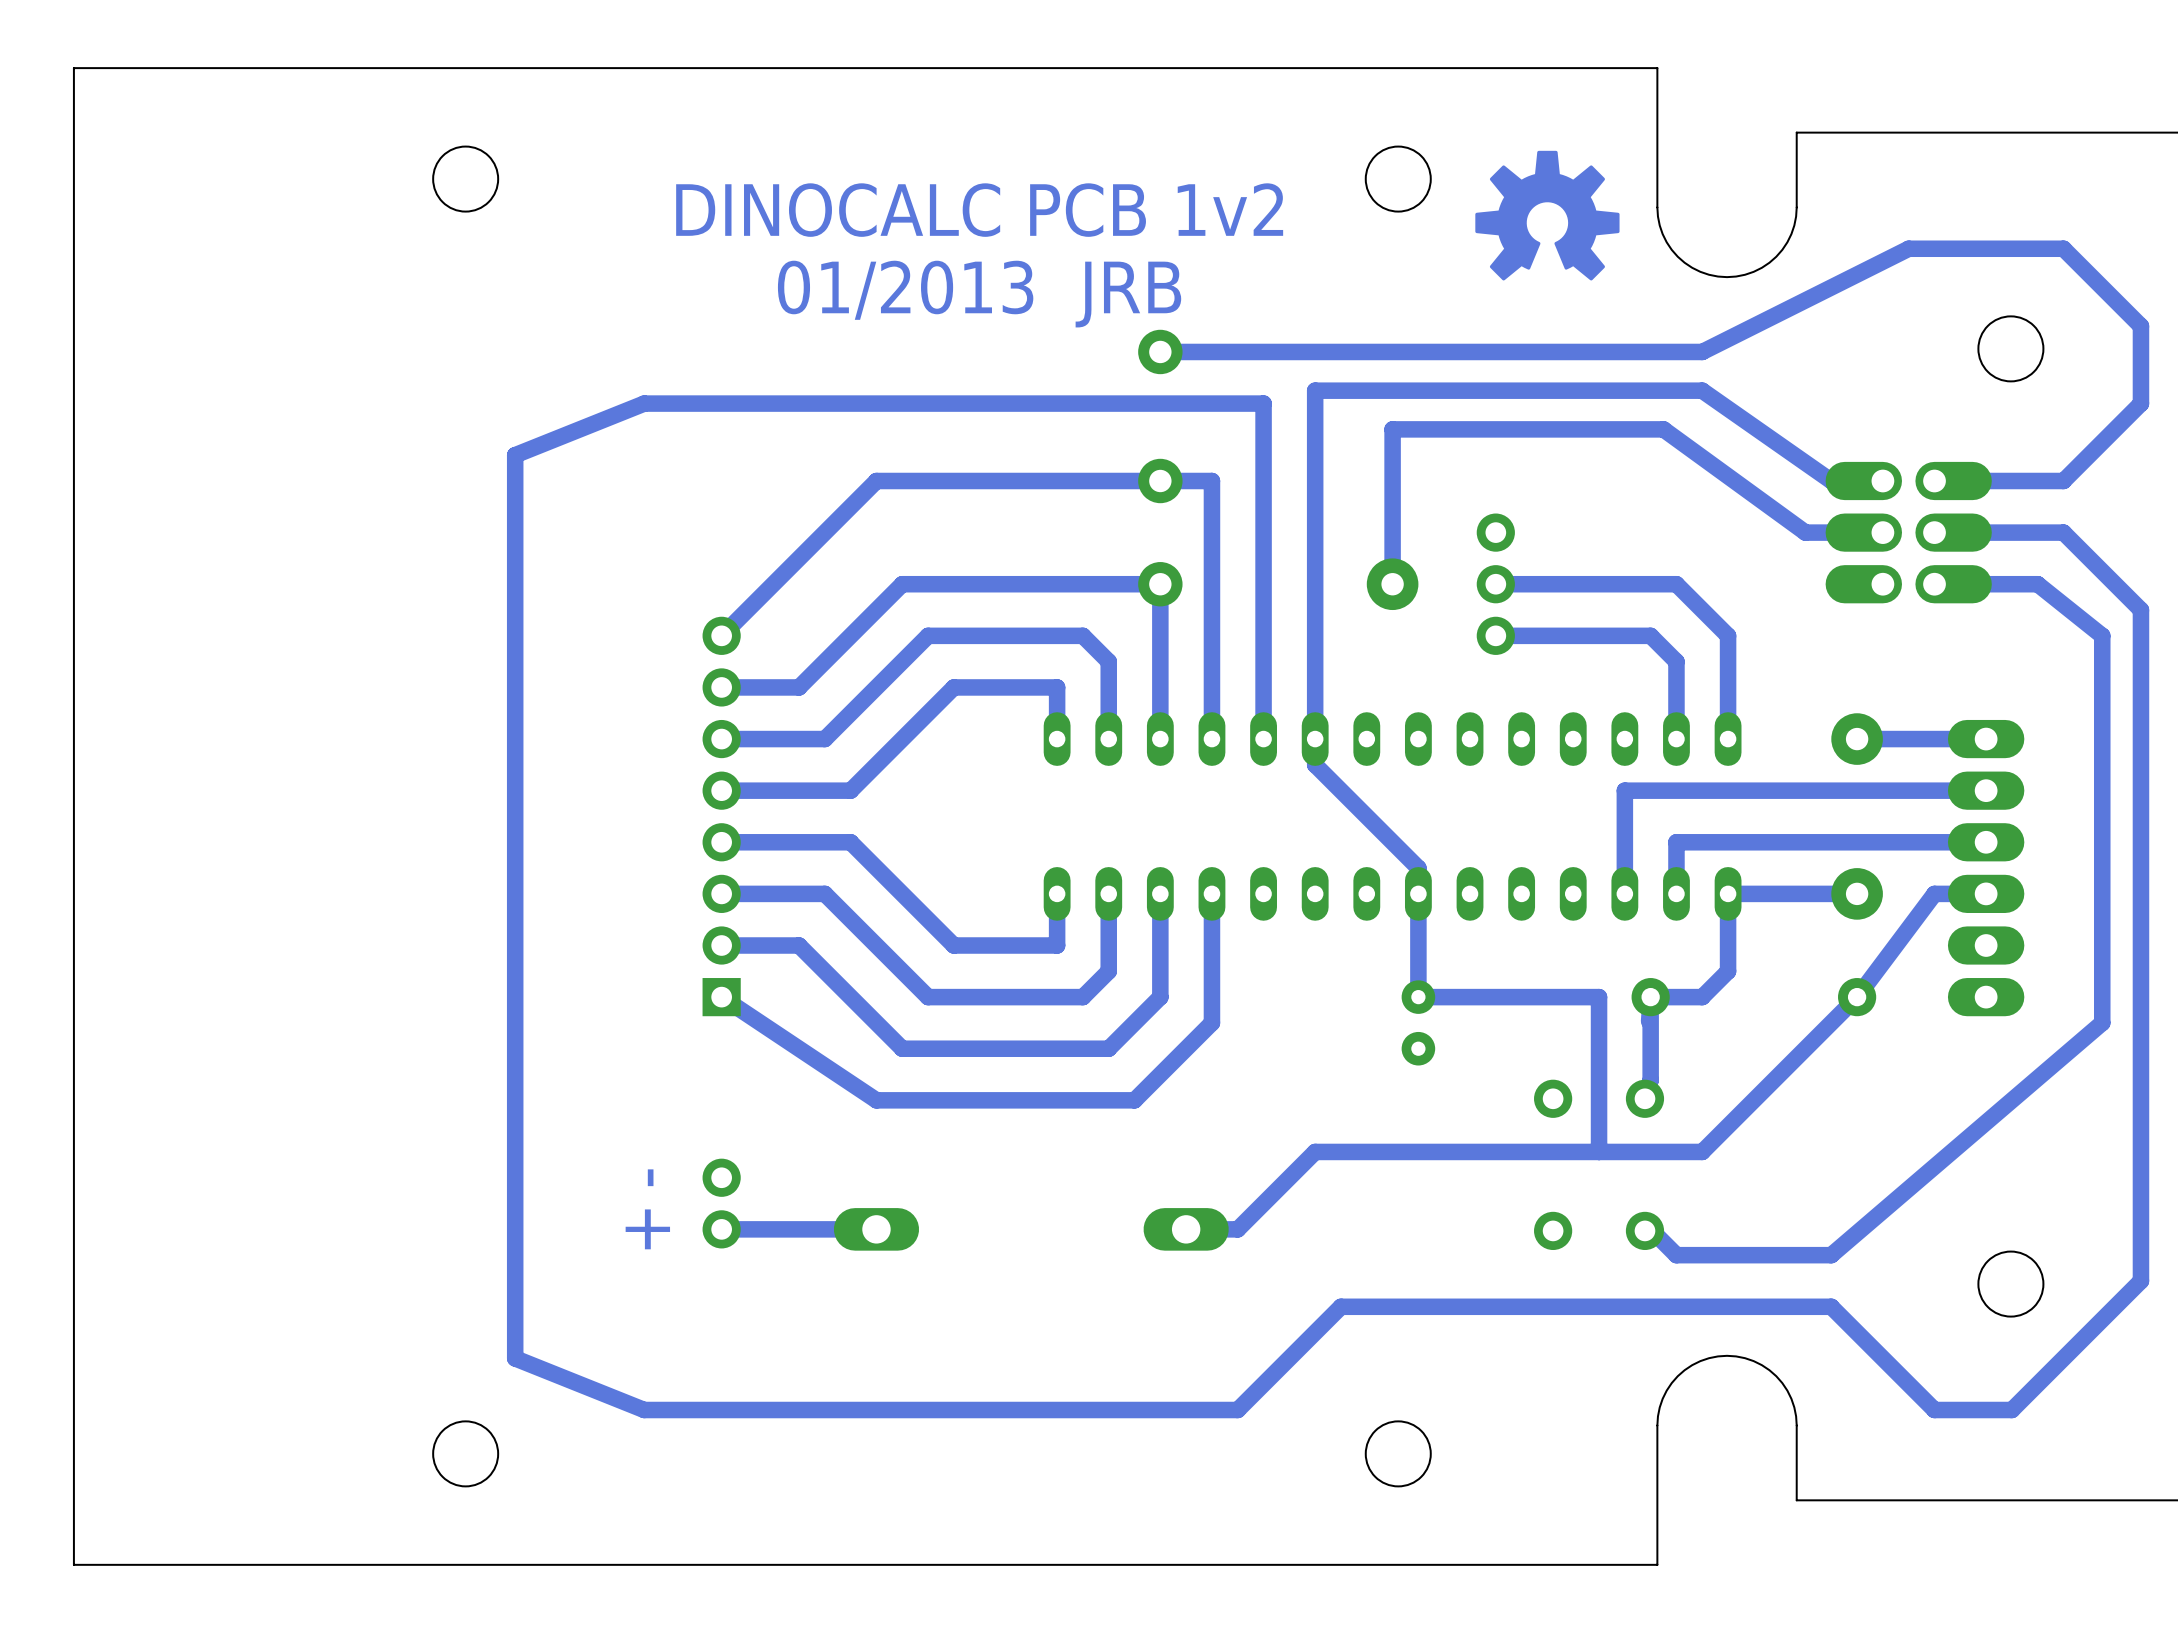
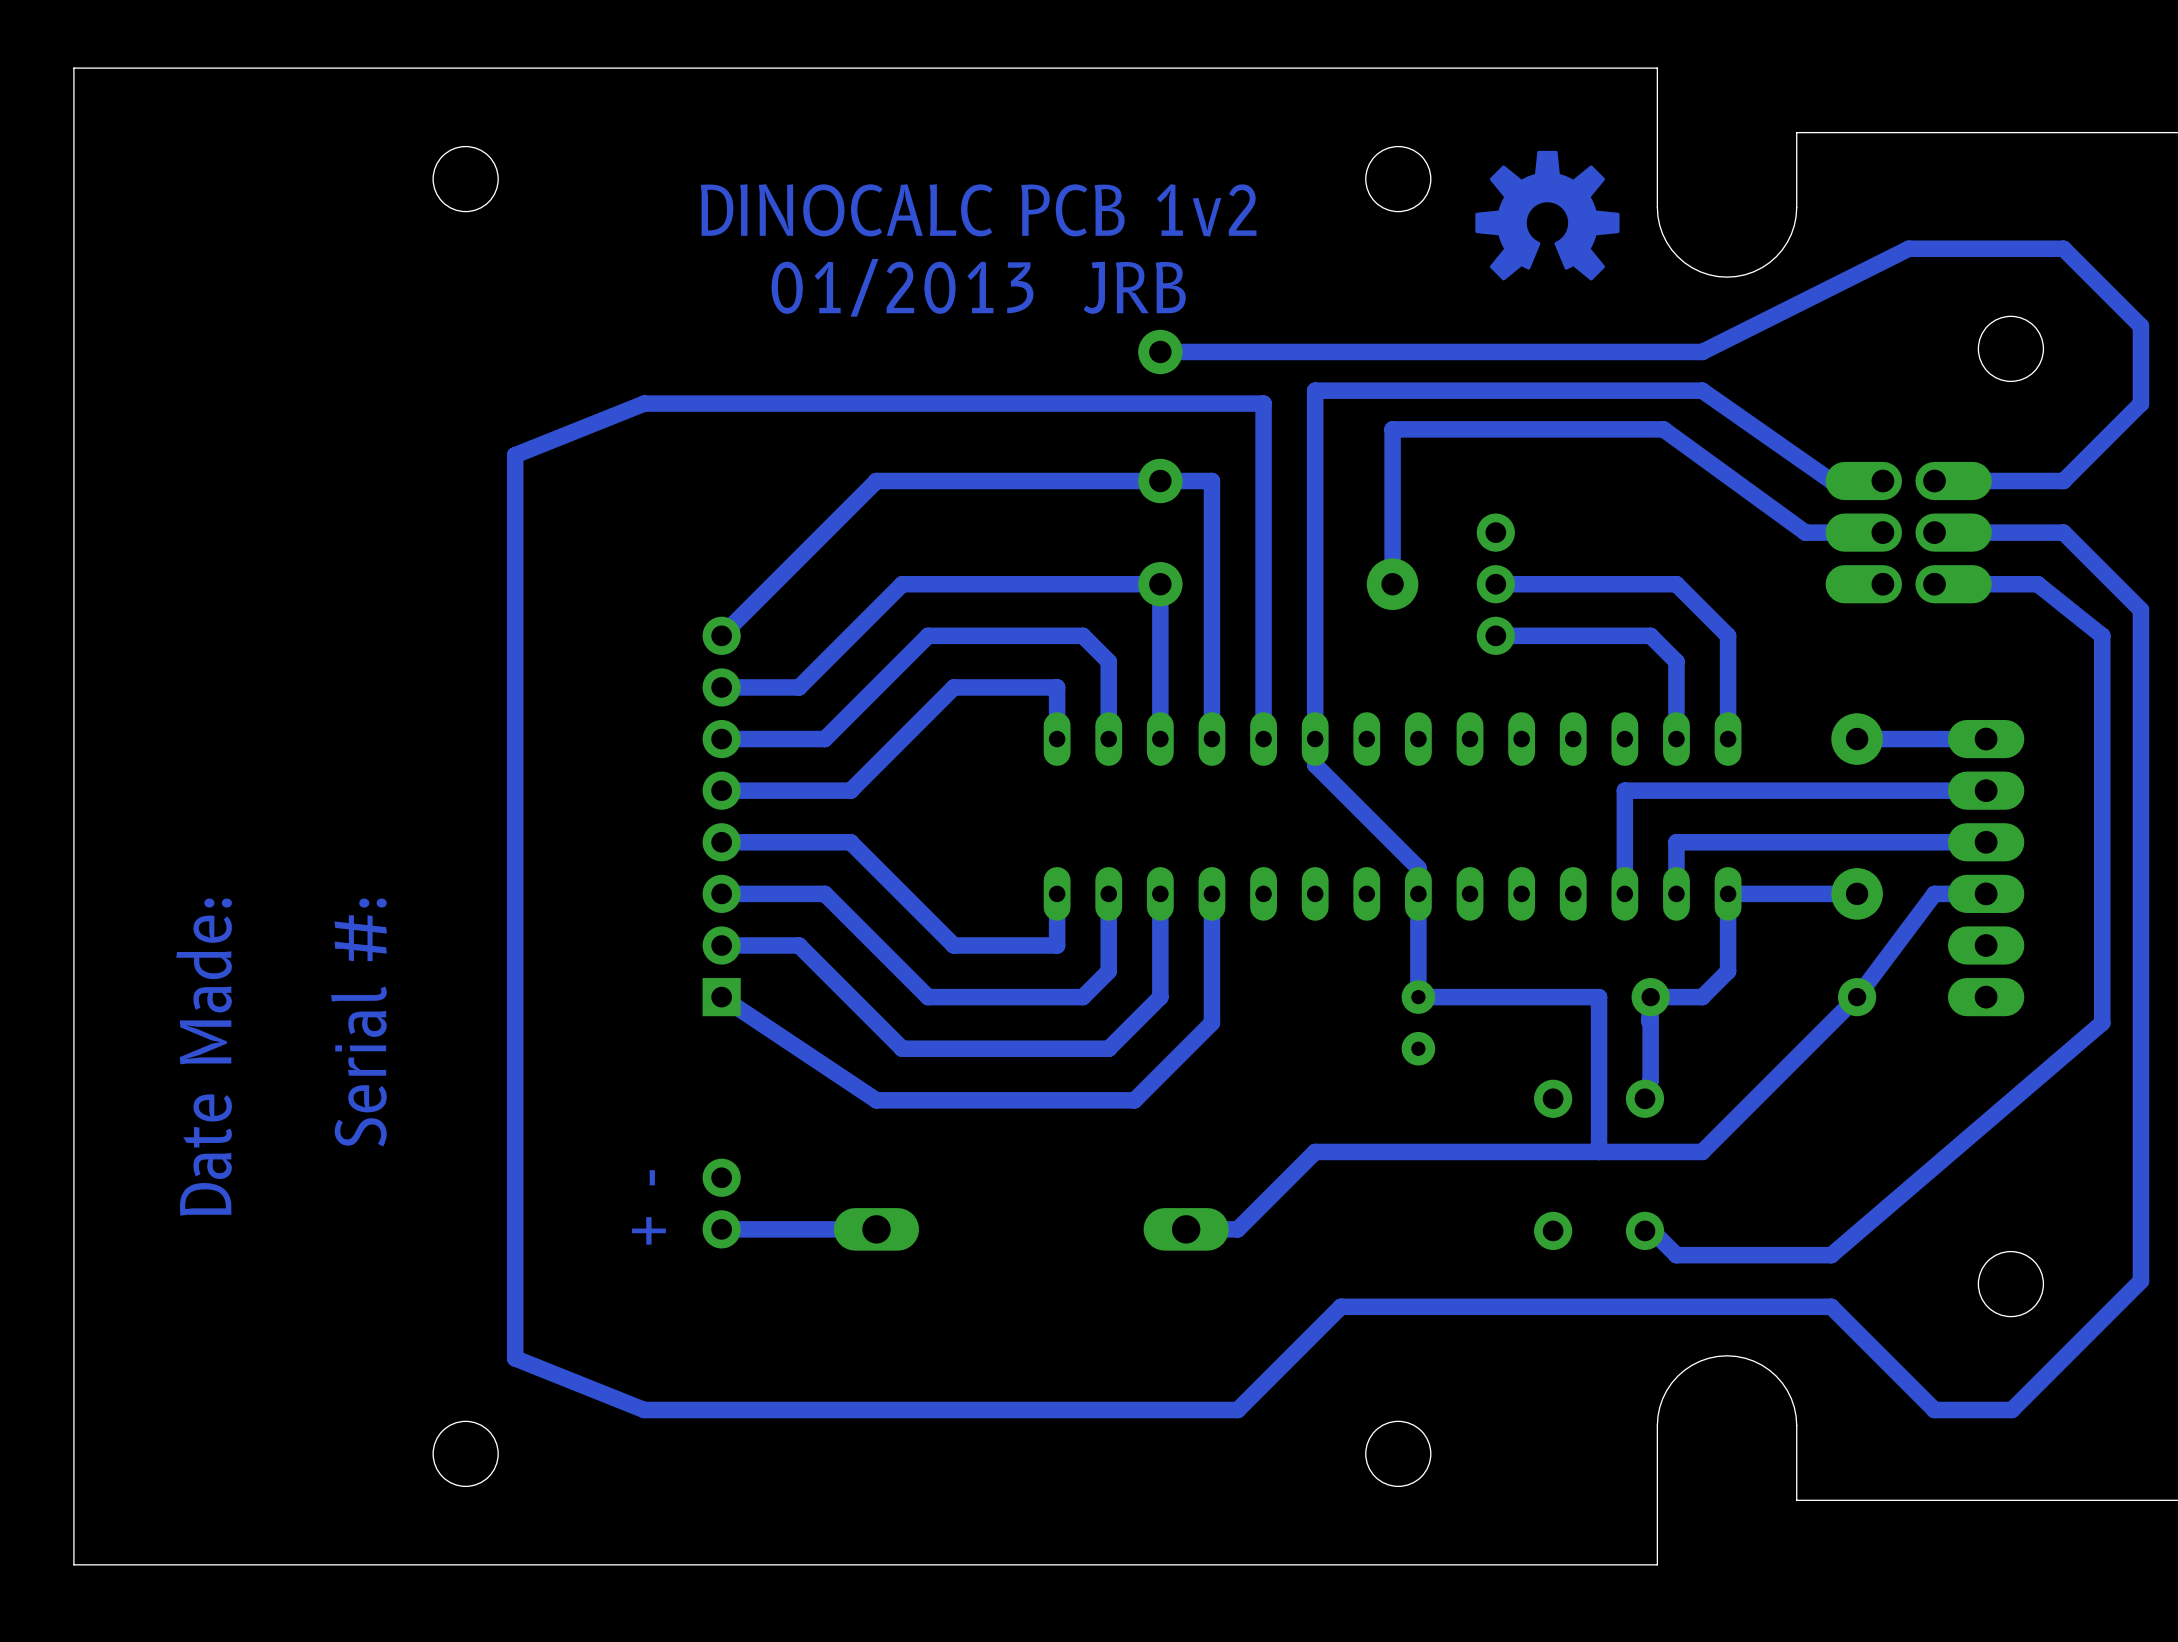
text: none -> Serial #: (359, 1022)
text: none -> Date Made: (204, 1057)

